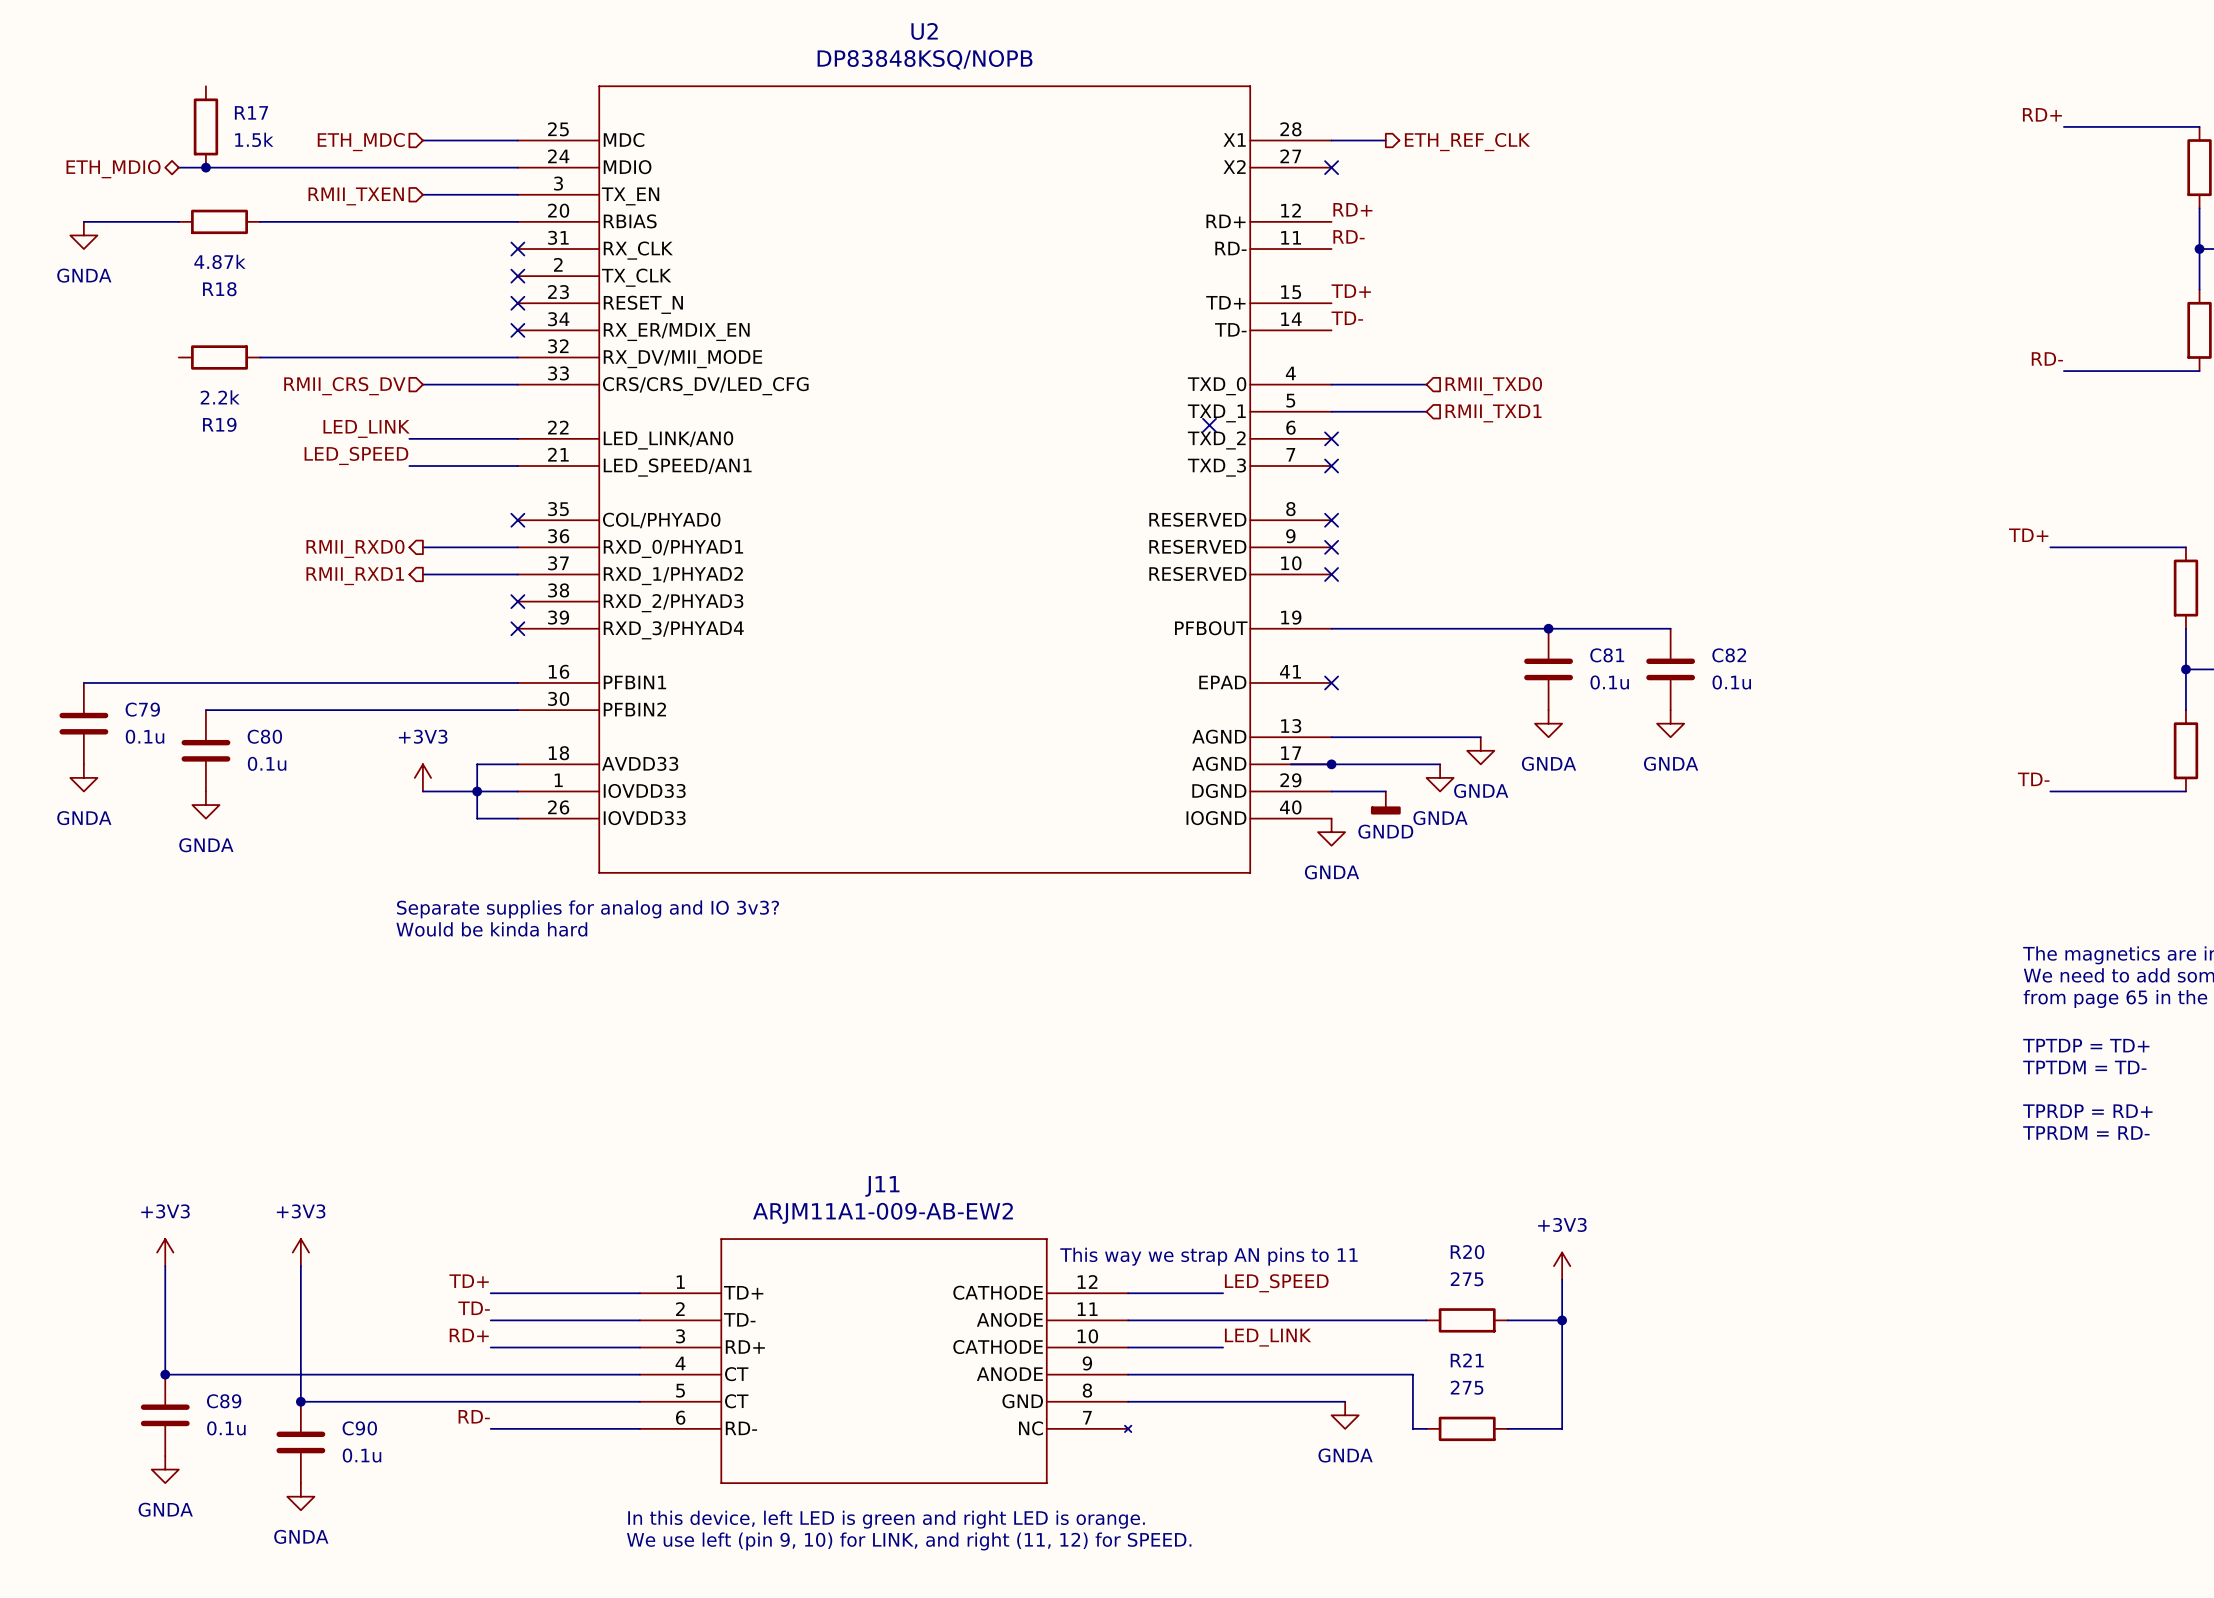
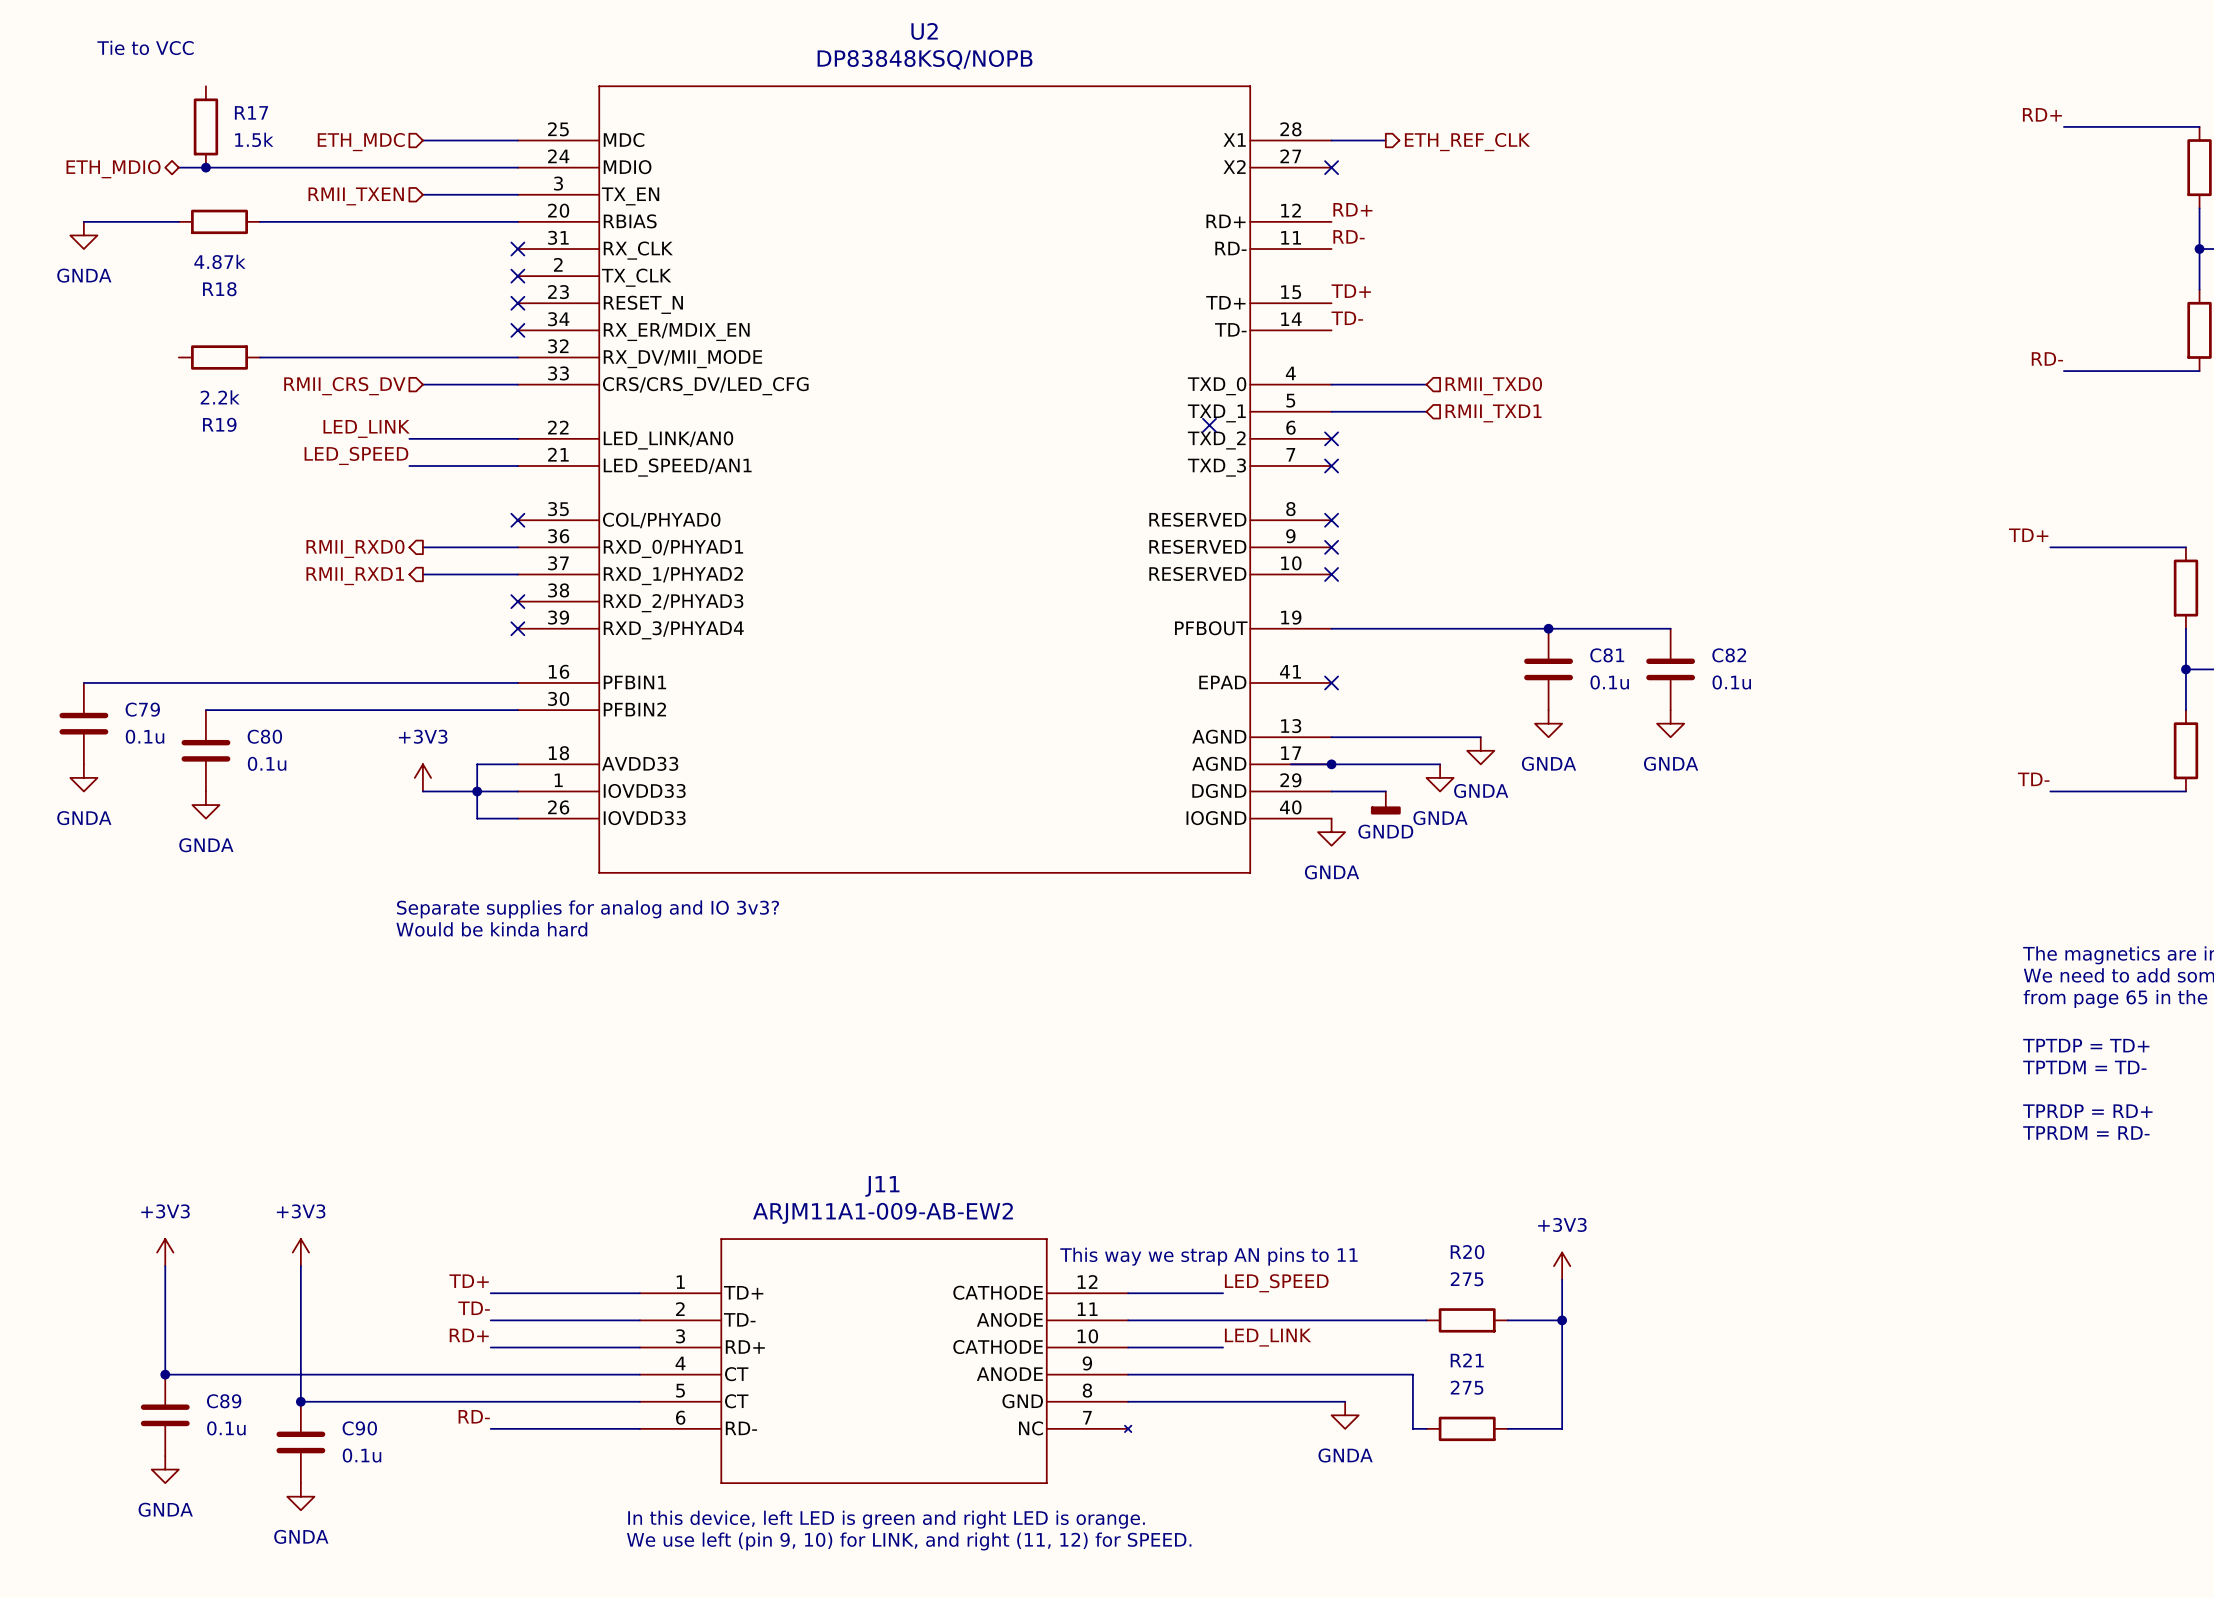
text: none -> Tie to VCC (145, 47)

